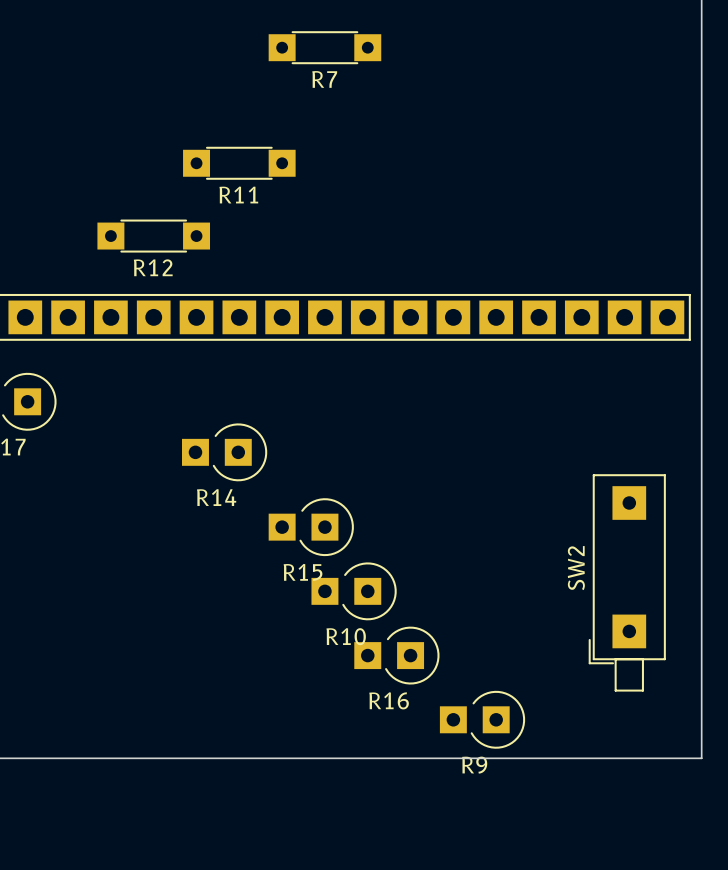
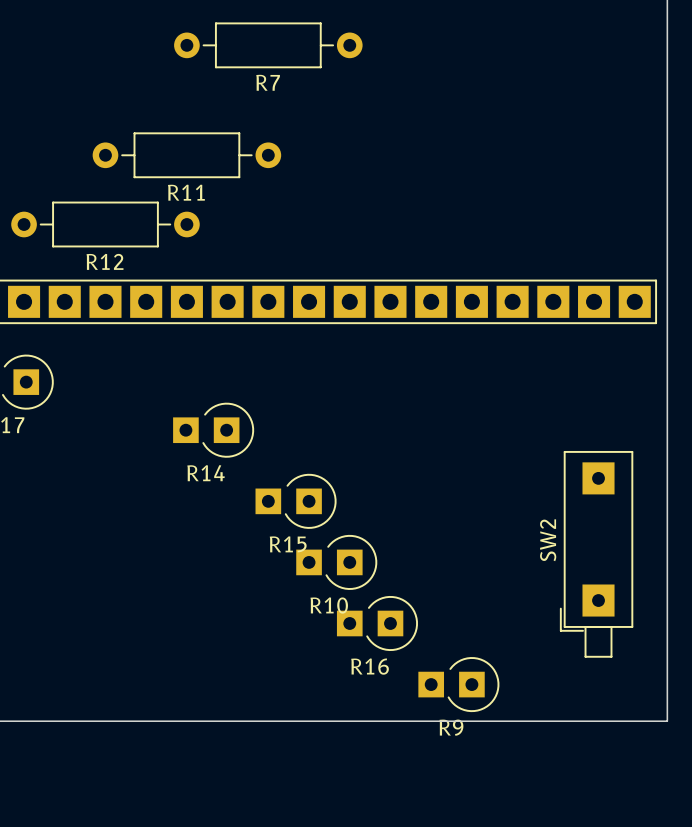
R7 footprint: [268, 31, 382, 65] -> [174, 22, 363, 69]
R11 footprint: [183, 146, 296, 180] -> [92, 132, 282, 179]
R12 footprint: [97, 219, 211, 253] -> [11, 201, 200, 248]

